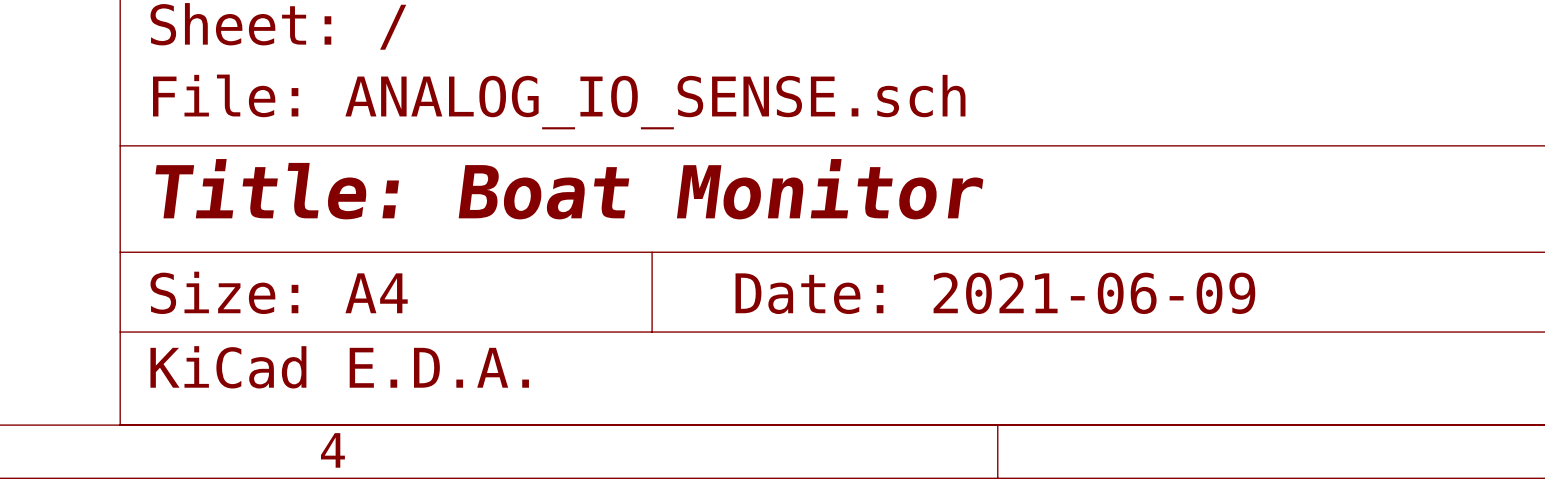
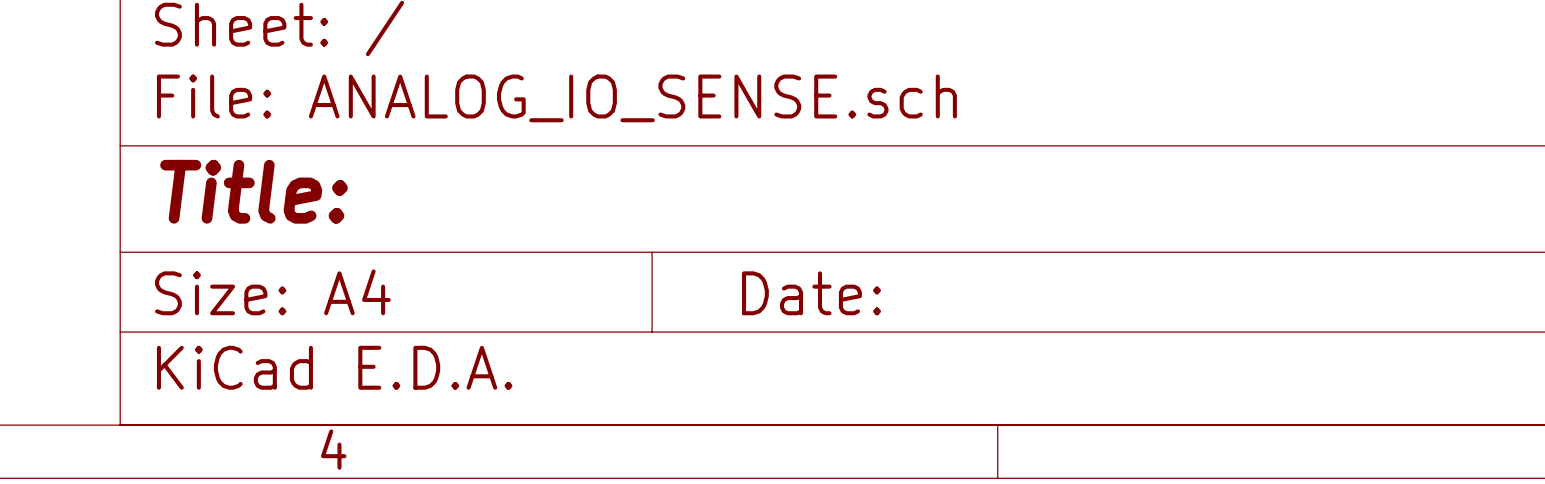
title block: Title: Boat Monitor (569, 189) -> Title: (253, 191)
title block: Date: 2021-06-09 (995, 293) -> Date: (811, 293)

